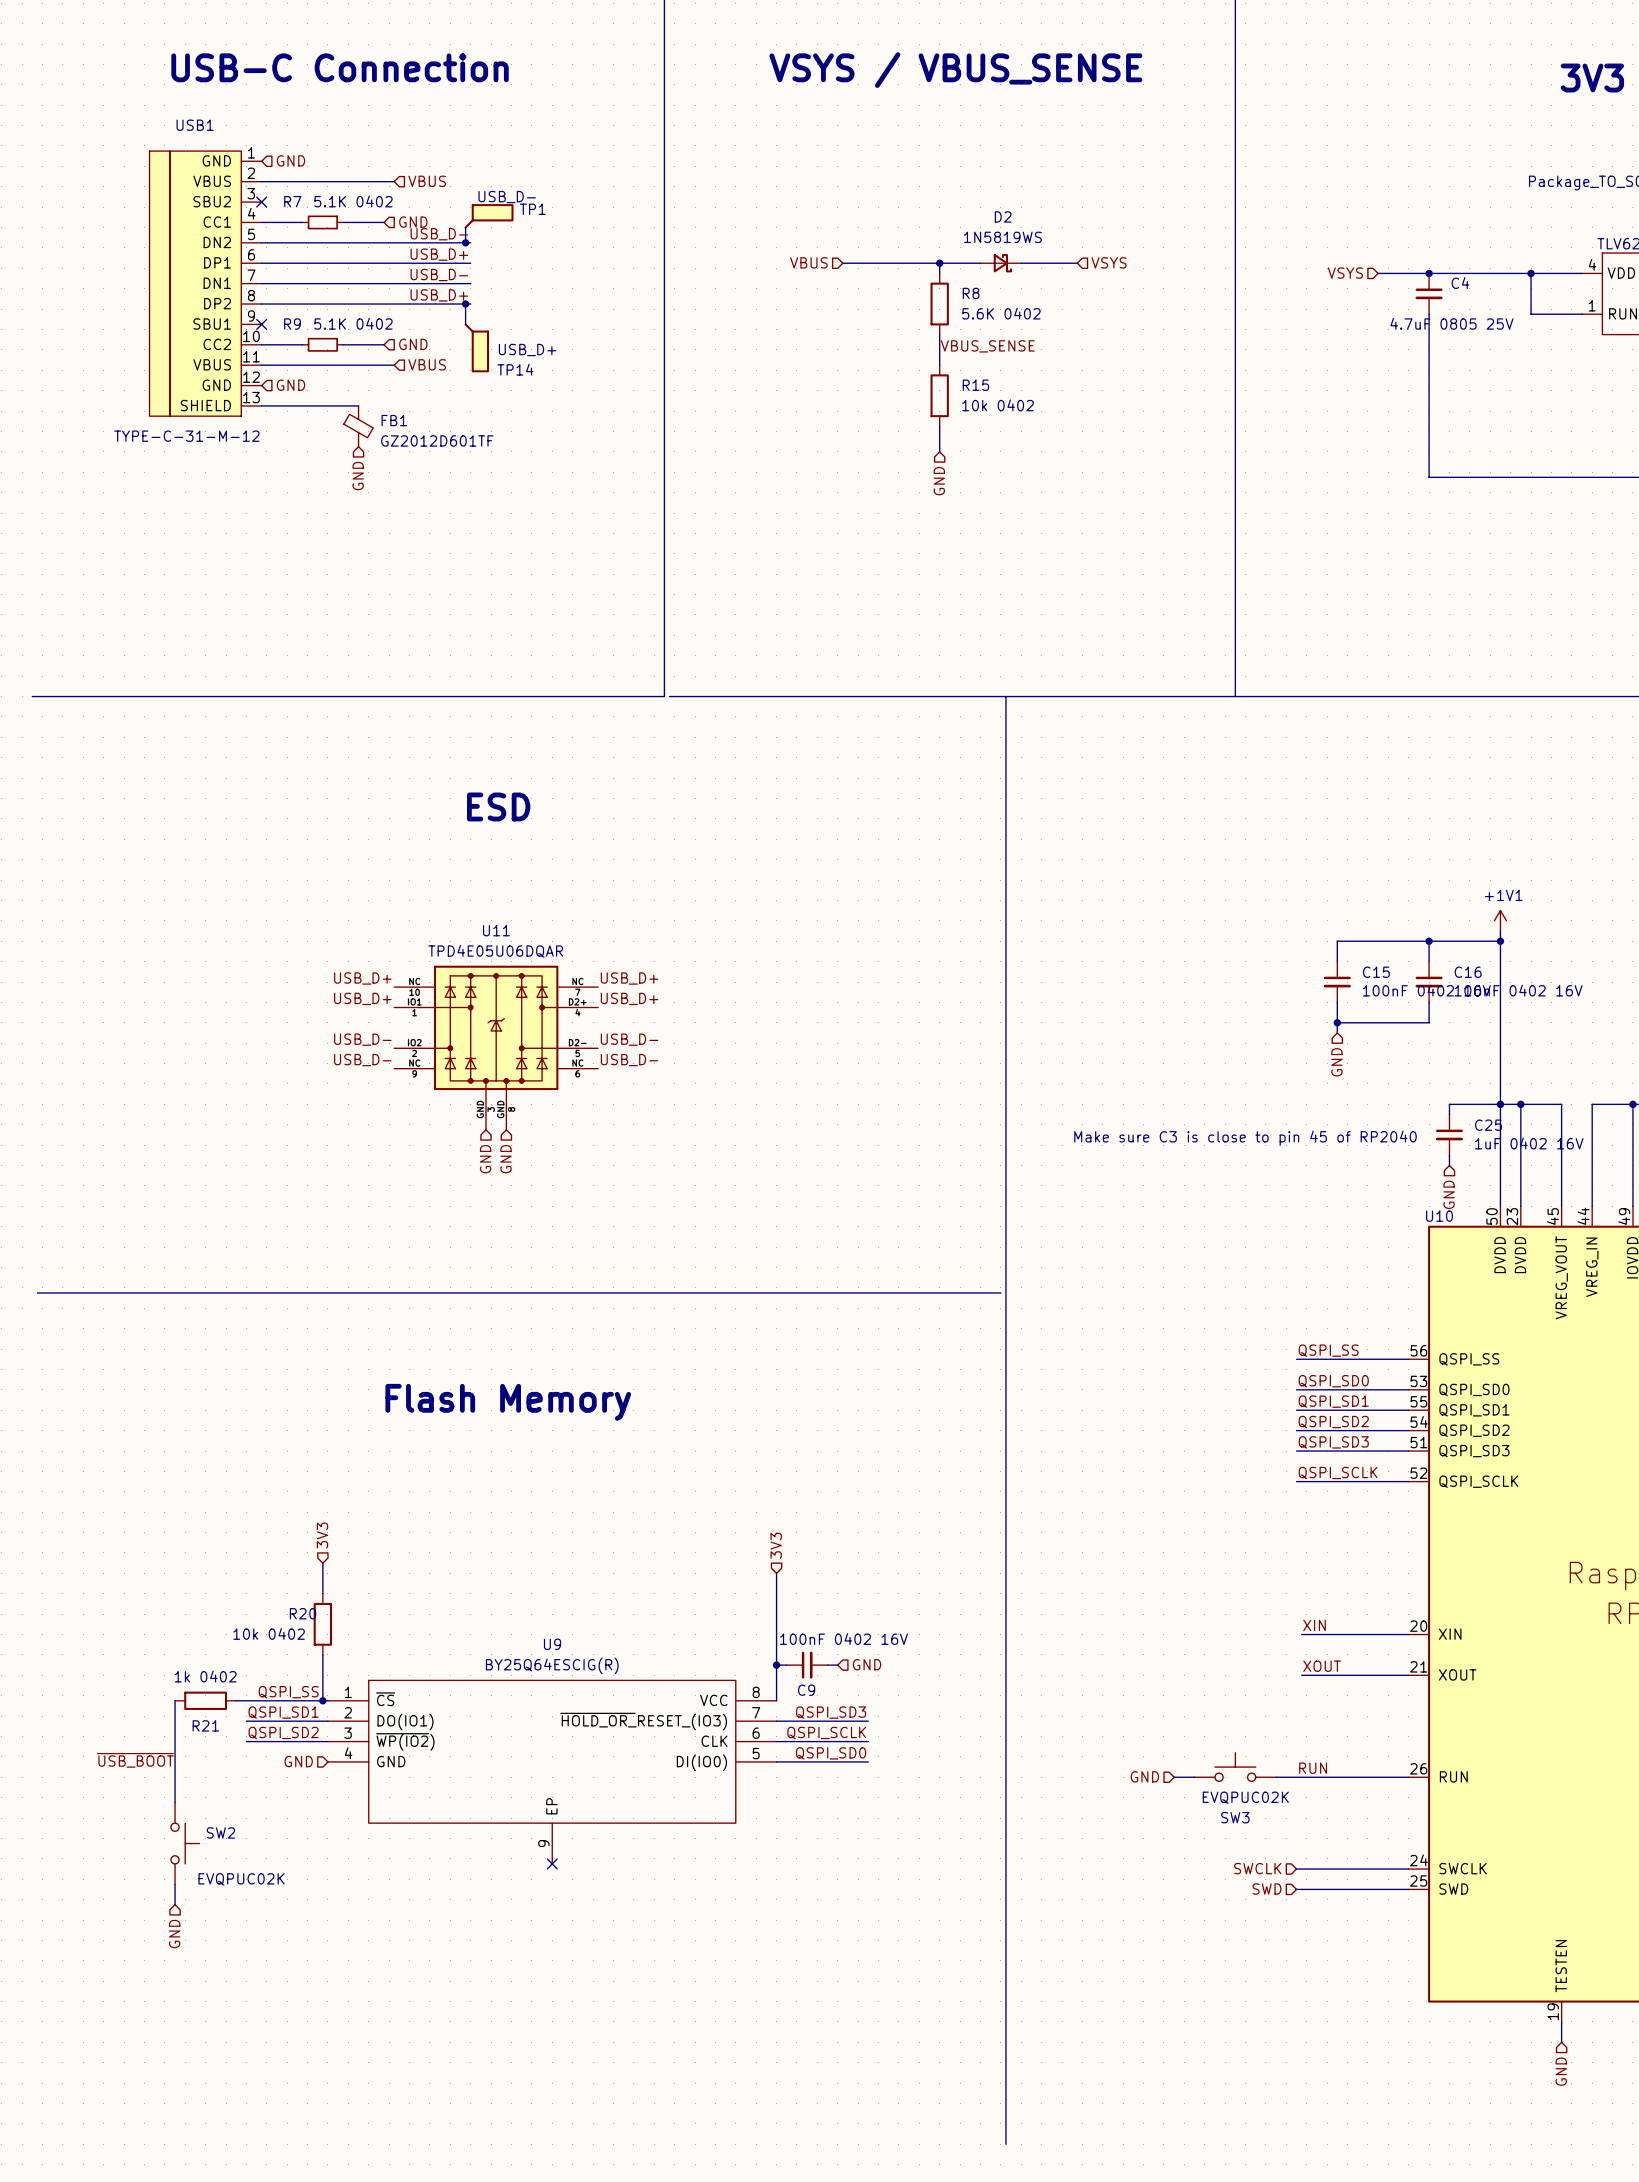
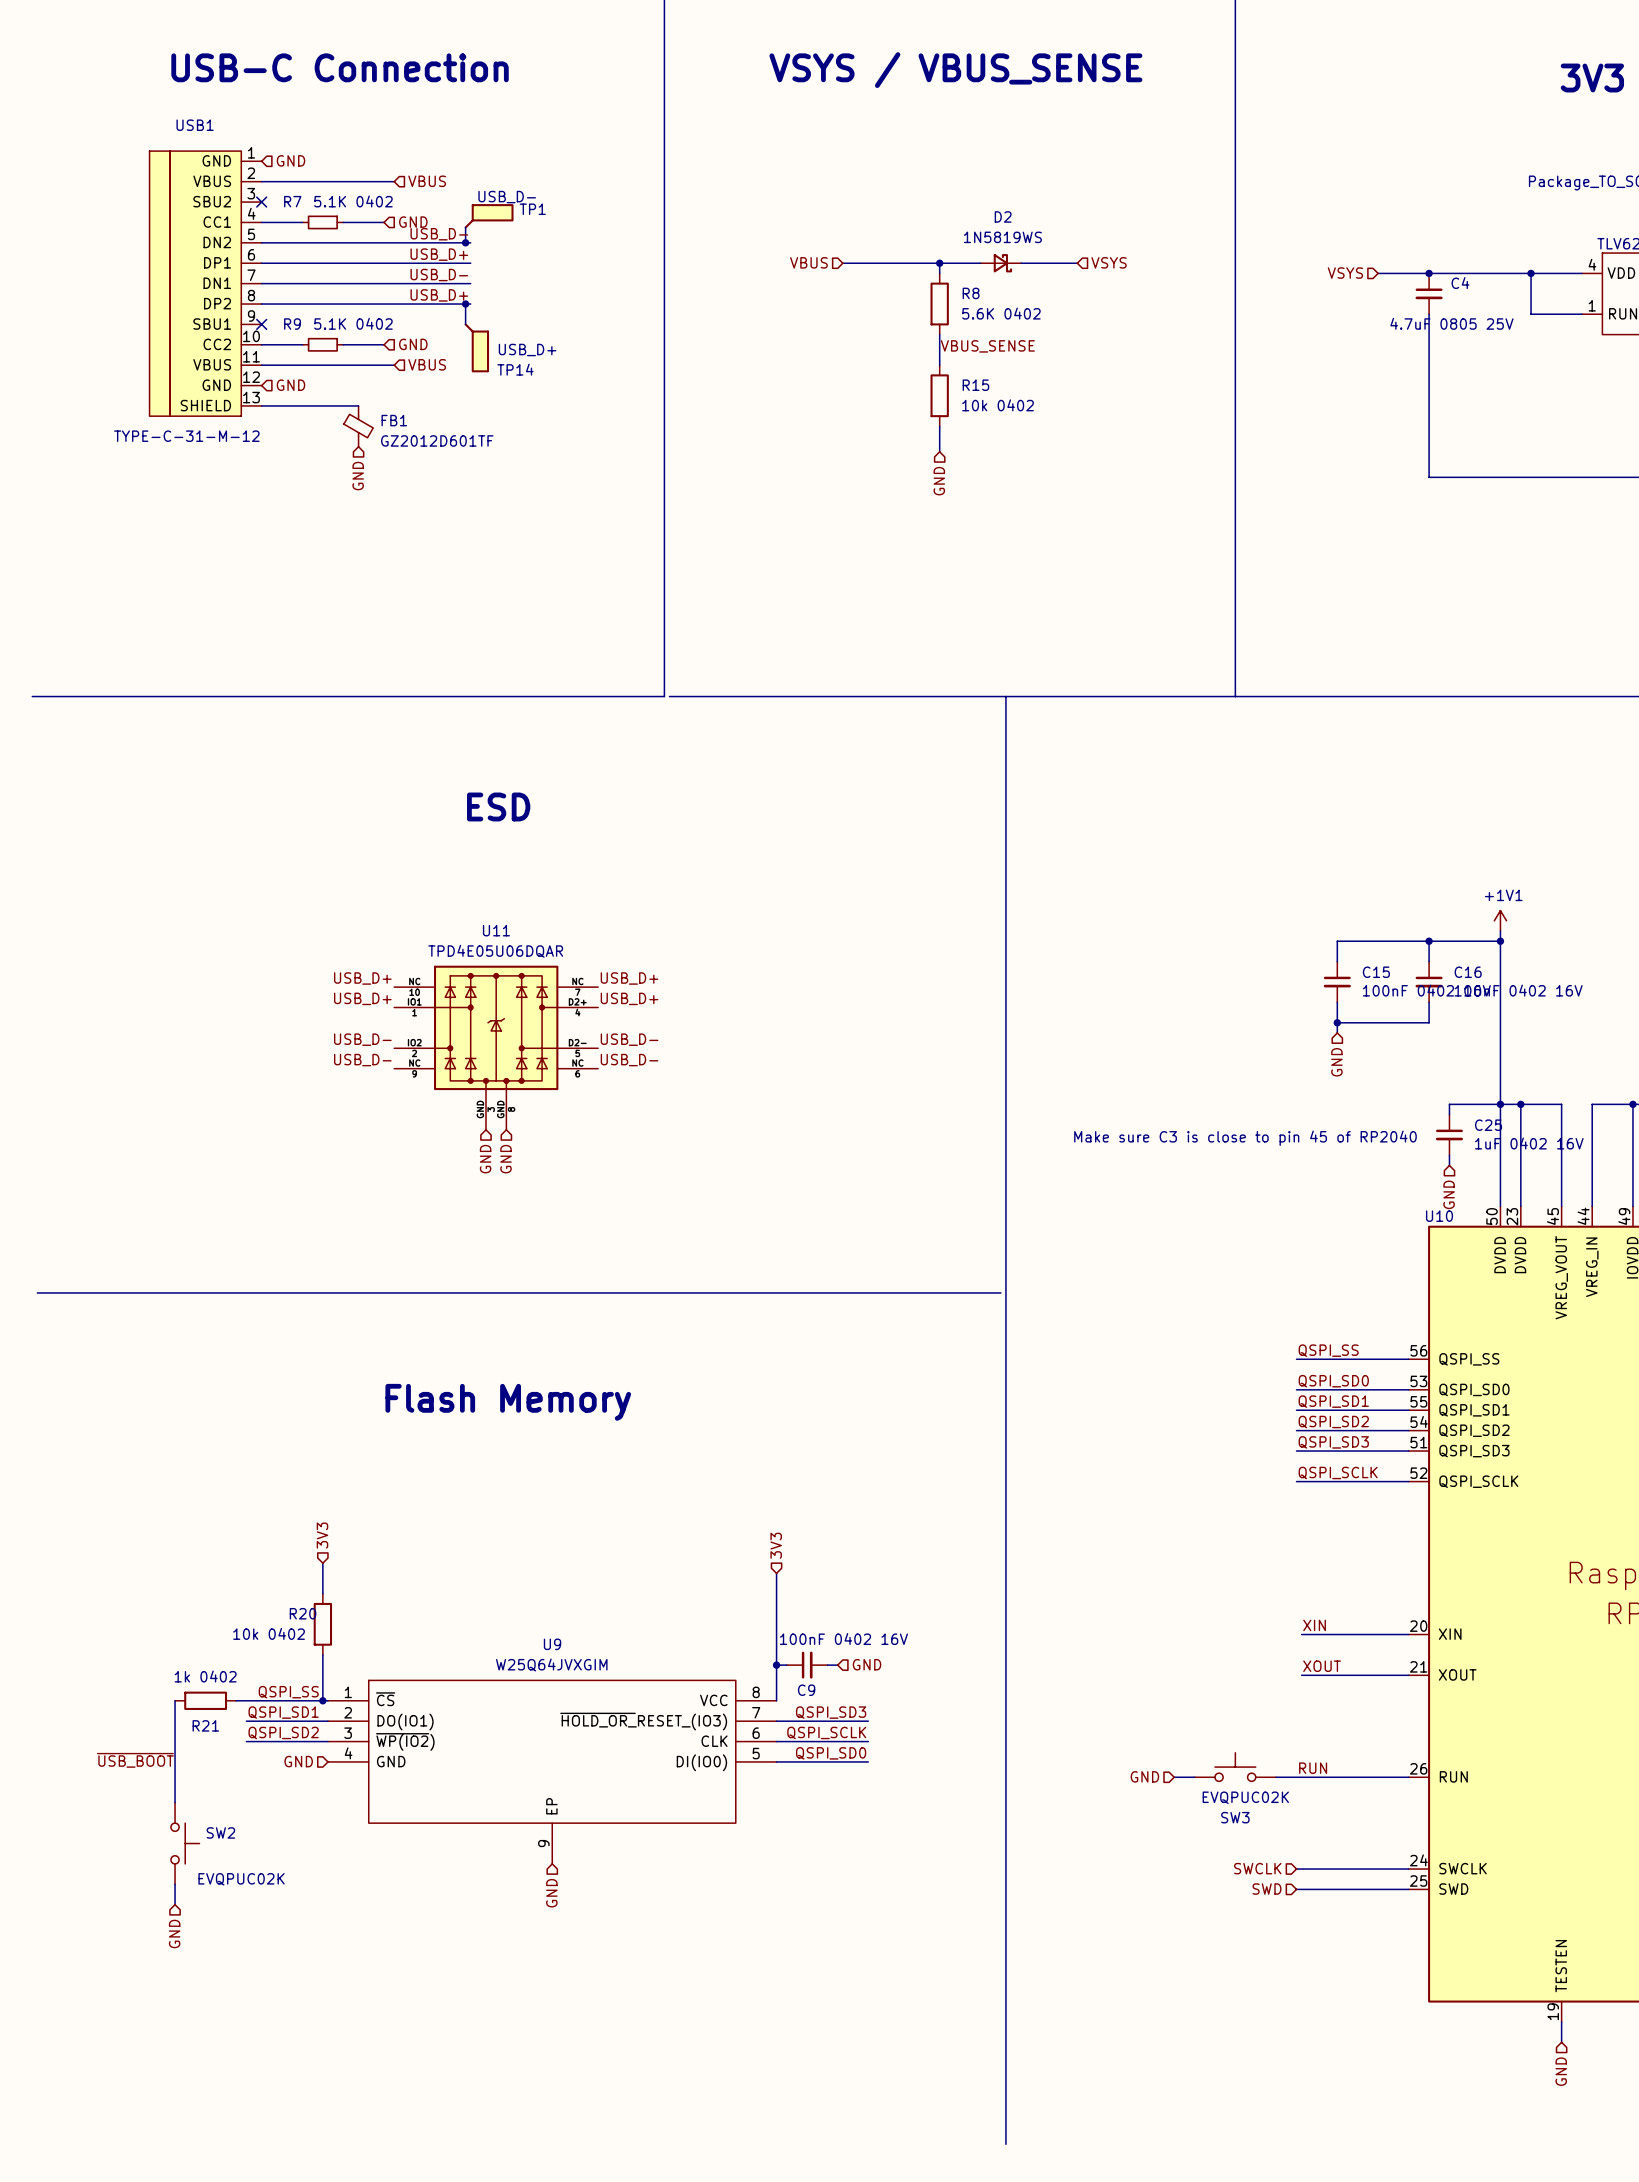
U9 value: BY25Q64ESCIG(R) (552, 1665) -> W25Q64JVXGIM (551, 1664)
no-connect mark: (552, 1863) -> none
hierarchical label: none -> GND (551, 1893)

